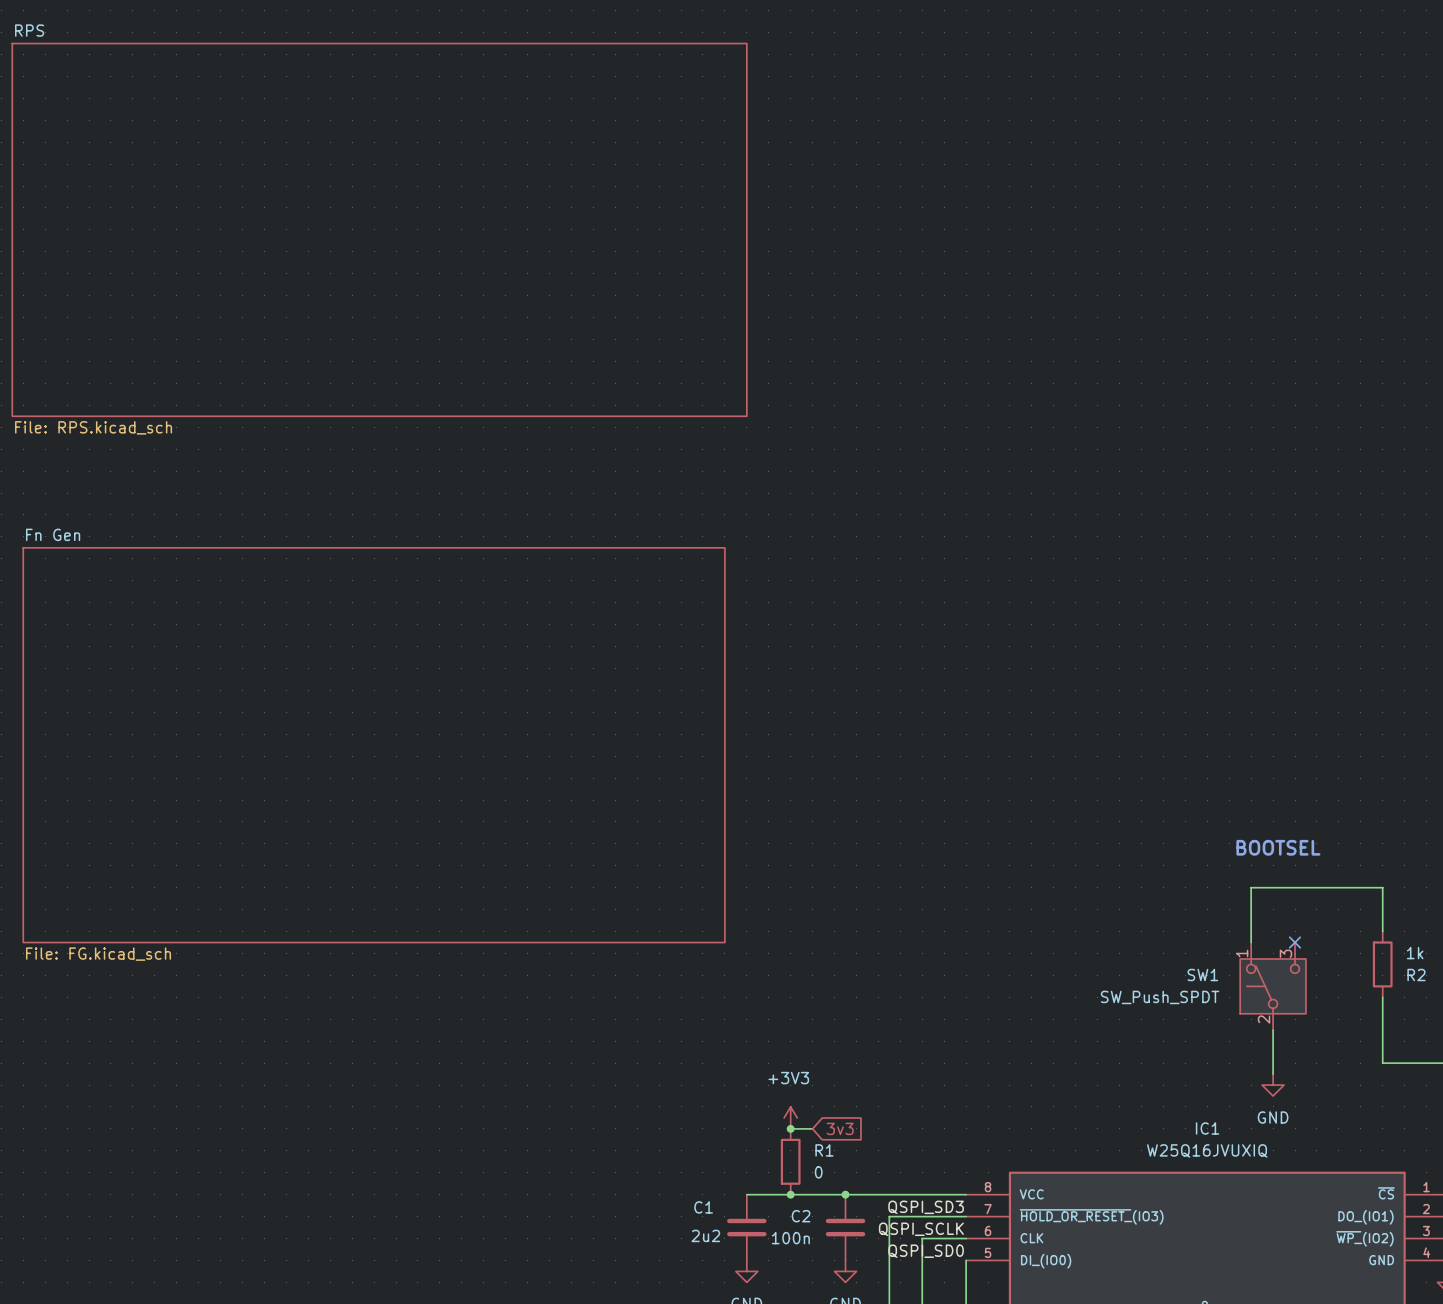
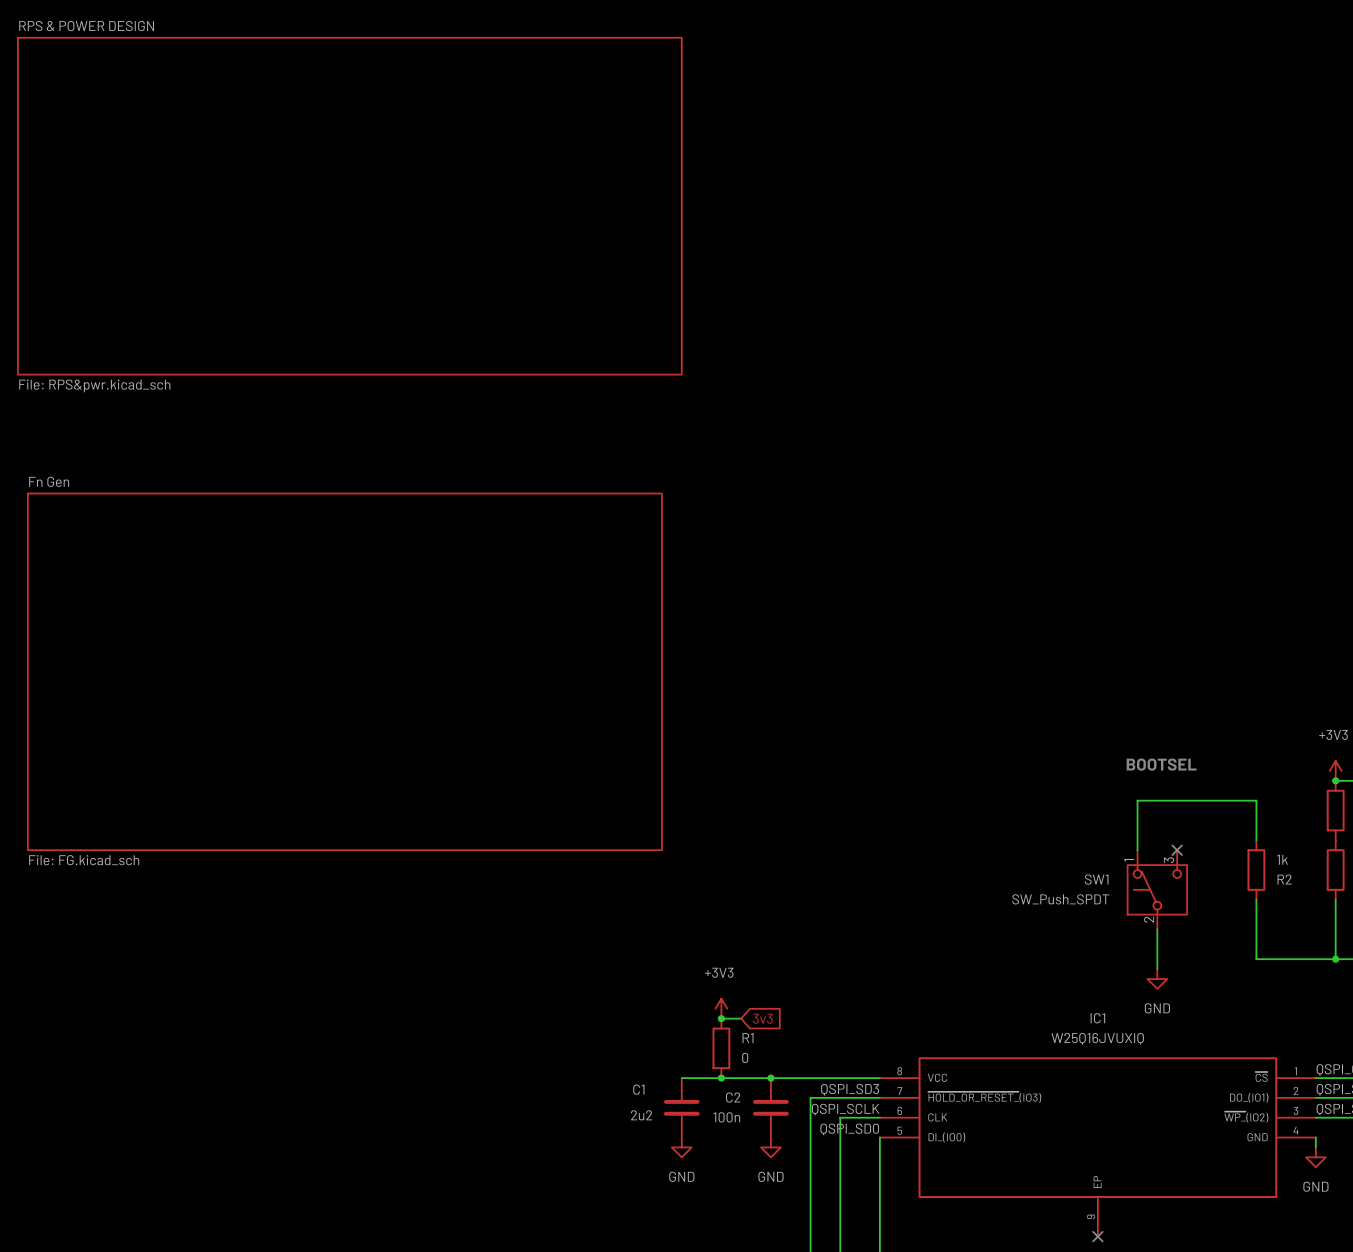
sheet RPS name: RPS (29, 30) -> RPS & POWER DESIGN (86, 26)
sheet RPS value: File: RPS.kicad_sch (93, 427) -> File: RPS&pwr.kicad_sch (94, 385)

